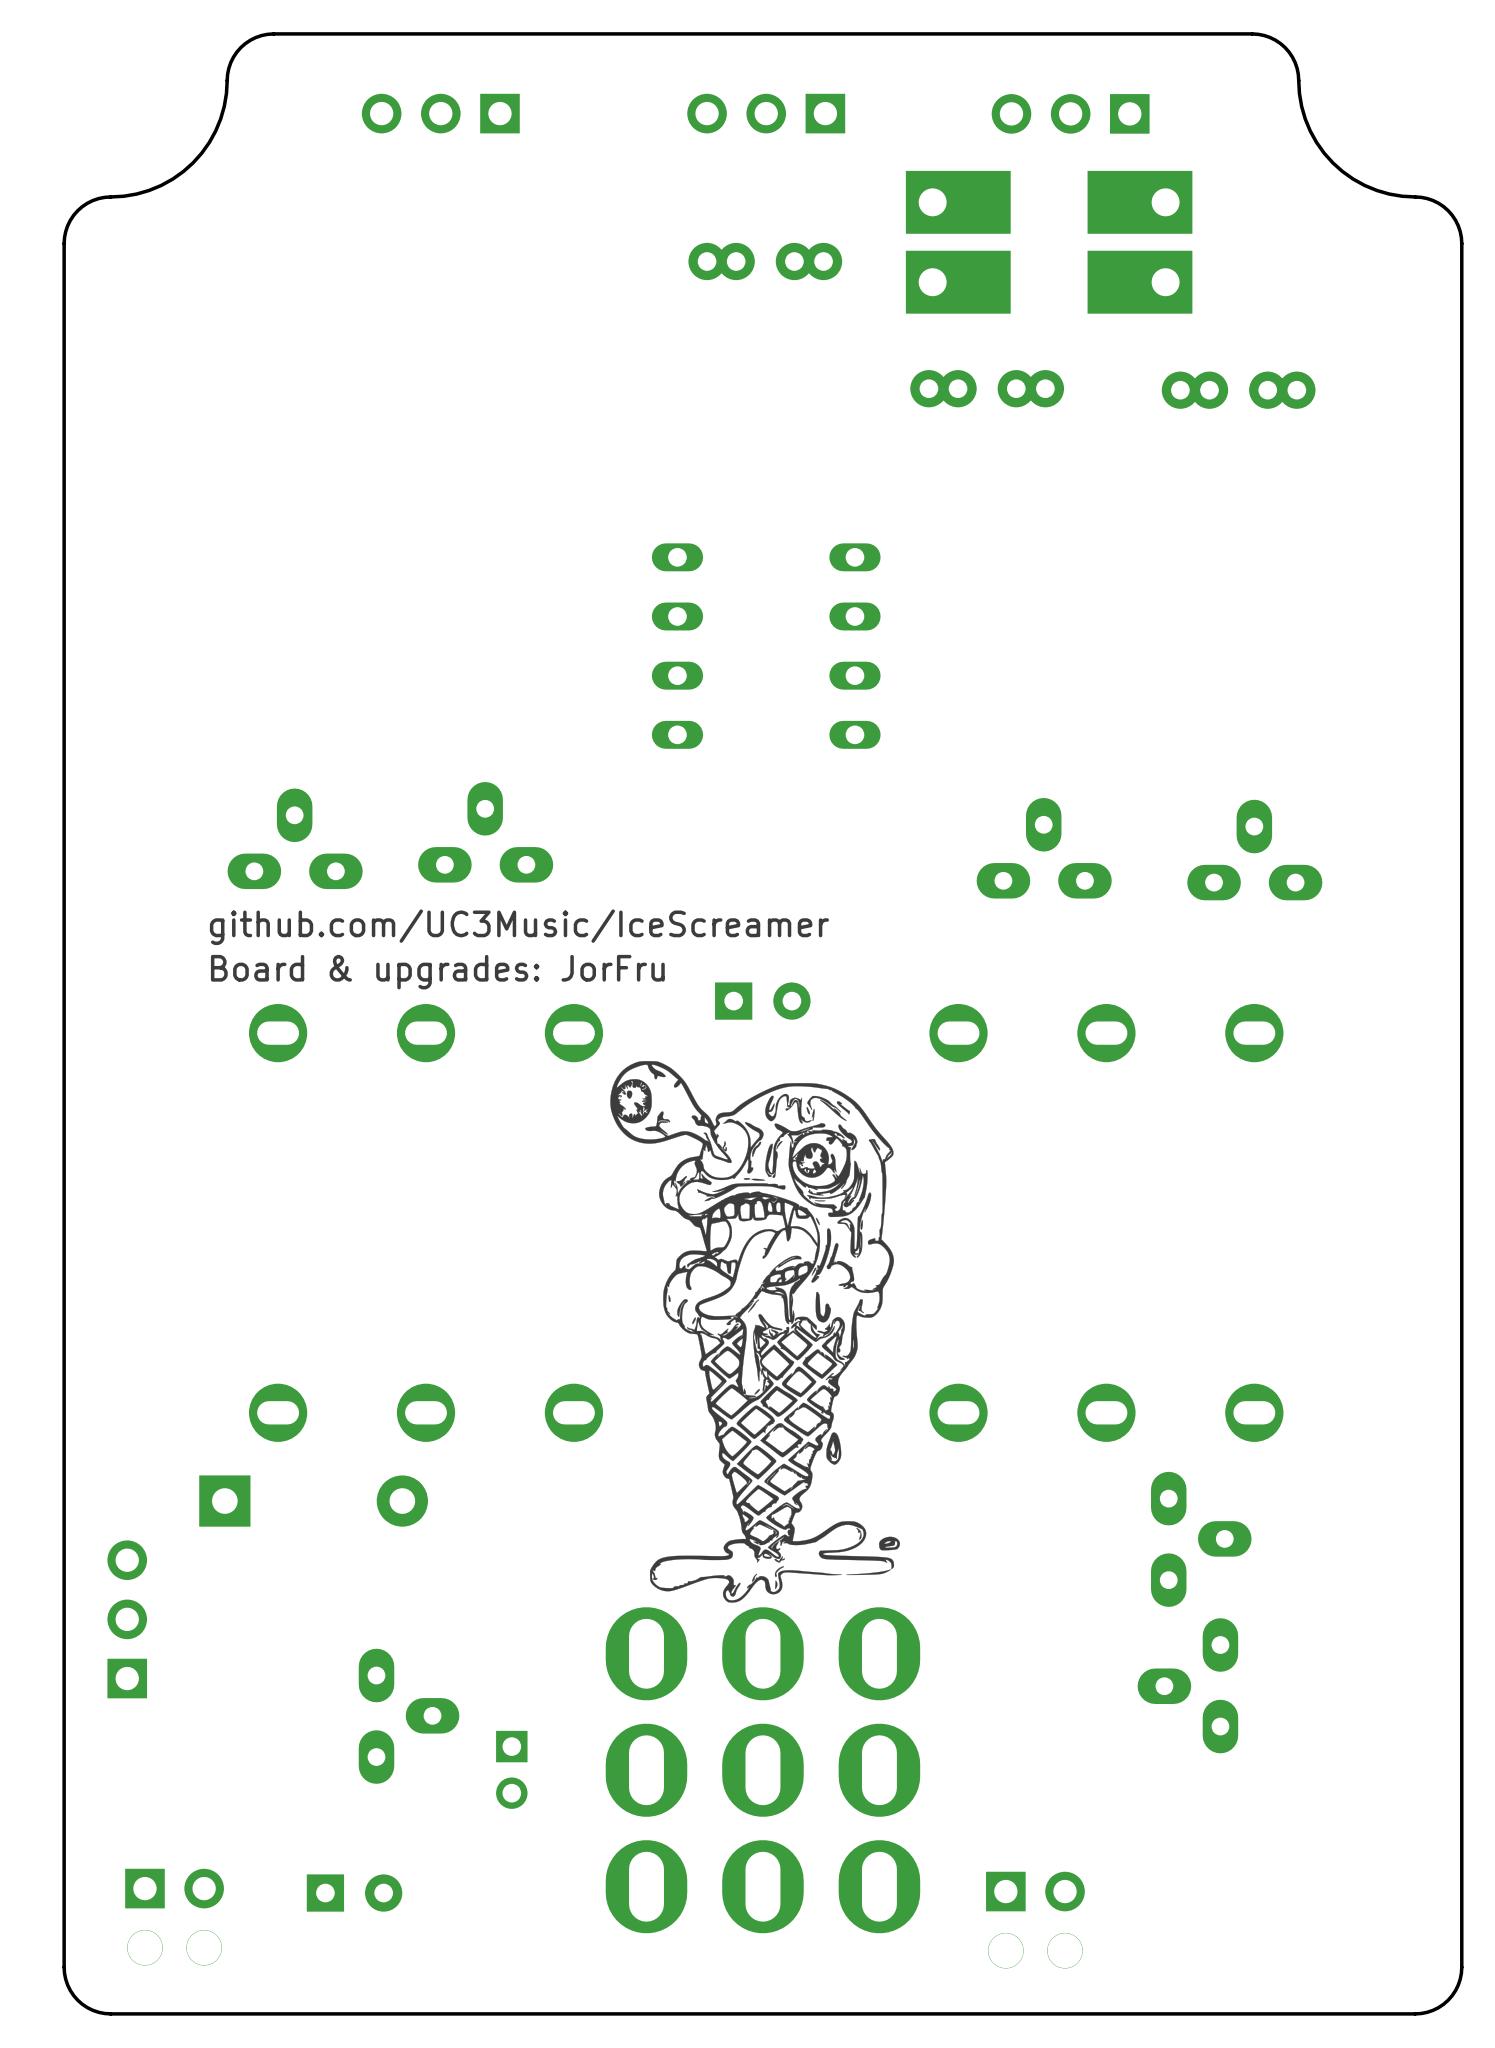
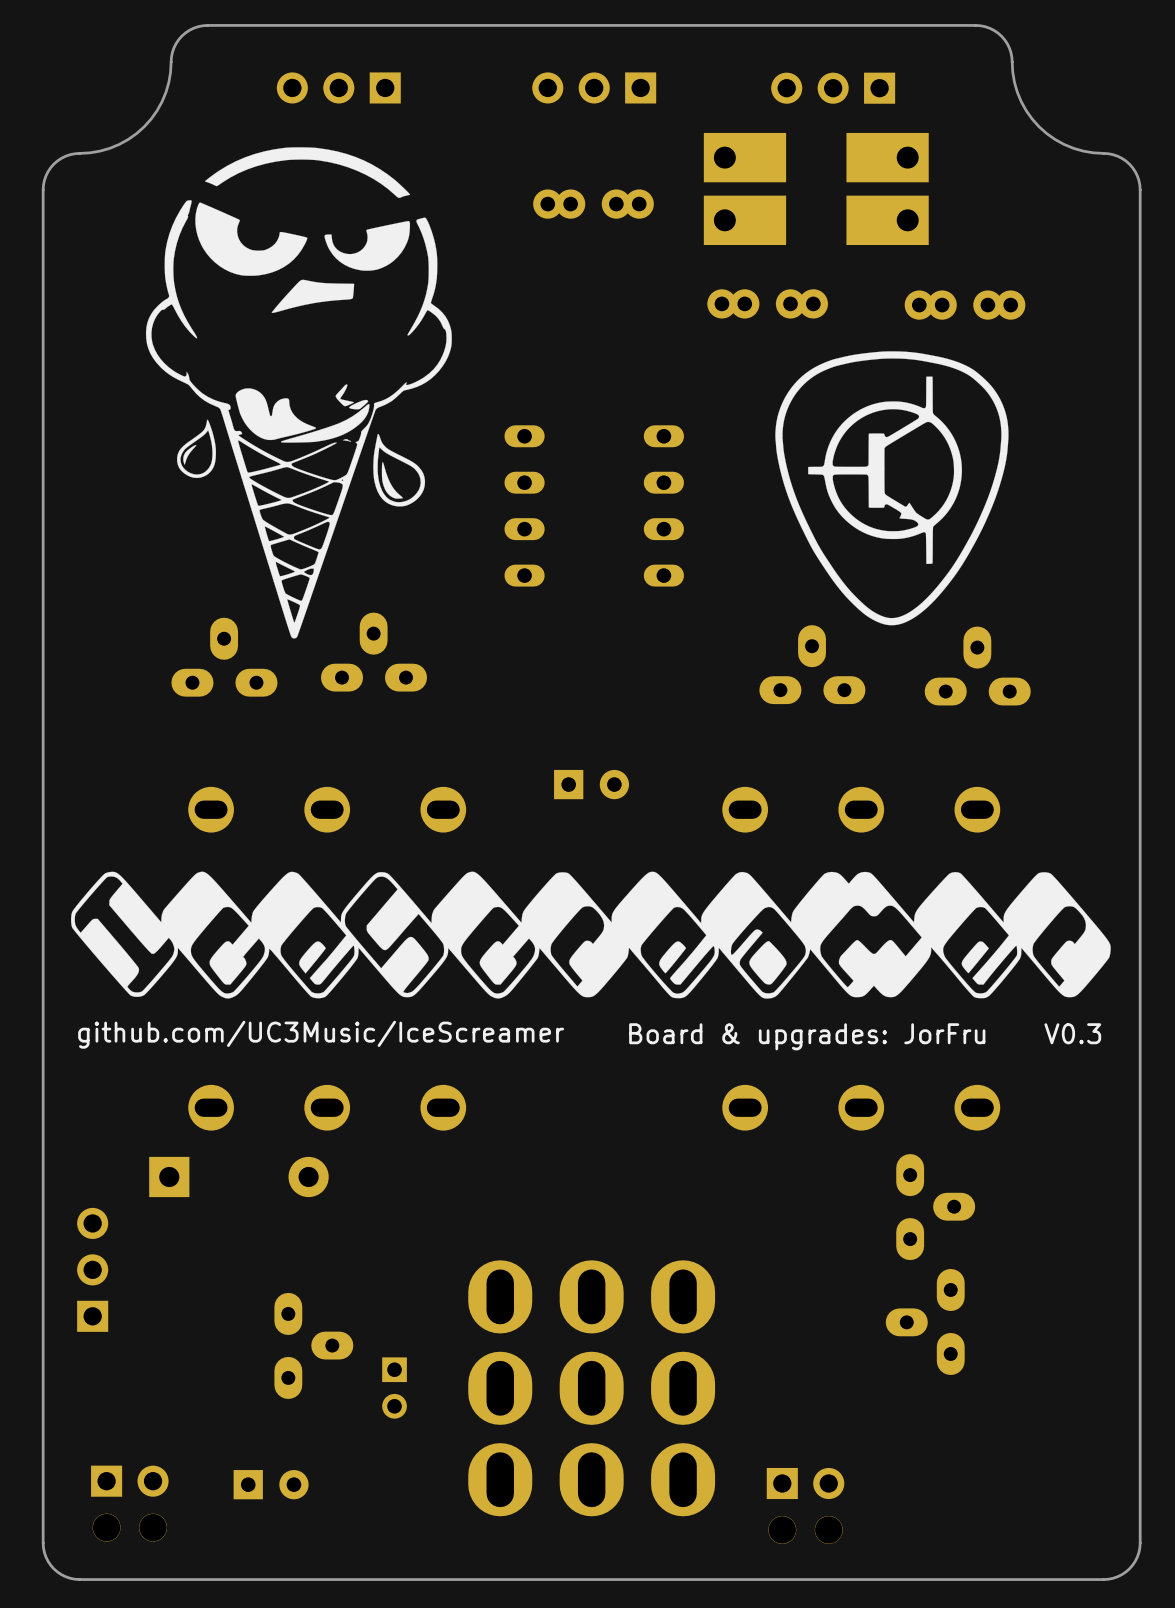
drawing: none -> [145, 147, 452, 639]
drawing: none -> [775, 351, 1009, 626]
text position: github.com/UC3Music/IceScreamer (519, 927) -> github.com/UC3Music/IceScreamer (321, 1034)
text: Board & upgrades: JorFru (437, 972) -> none
drawing: [610, 1061, 901, 1603] -> none
drawing: none -> [71, 871, 1111, 999]
text: none -> Board & upgrades: JorFru V0.3 (865, 1036)

